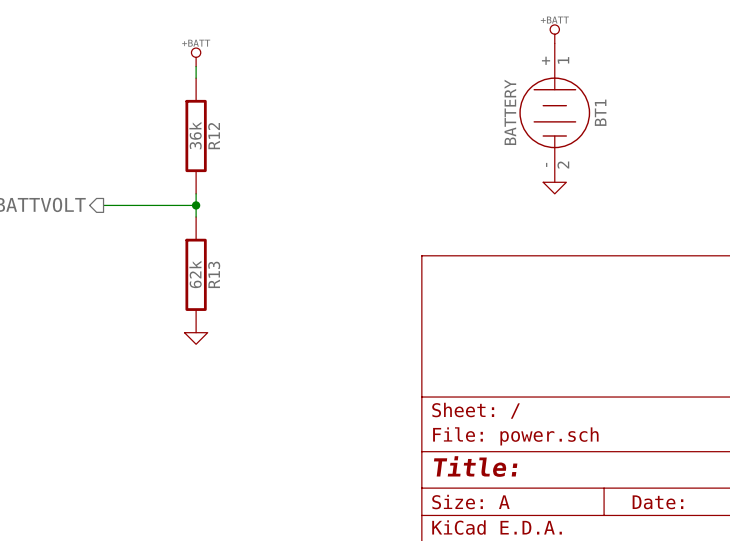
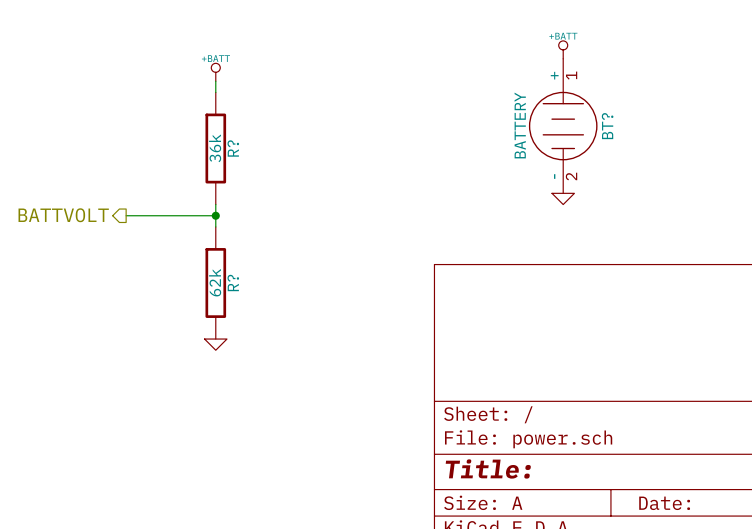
BT1 name: BT1 (600, 112) -> BT? (607, 126)
R12 name: R12 (214, 136) -> R? (233, 148)
R13 name: R13 (214, 274) -> R? (233, 282)

